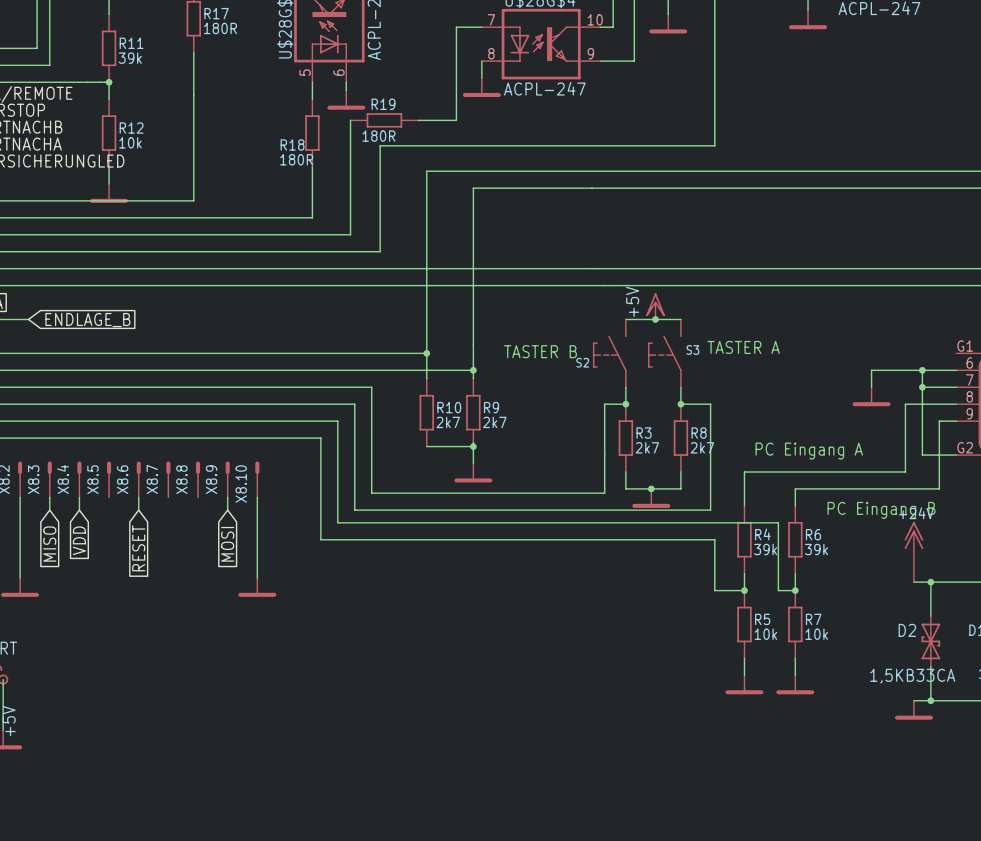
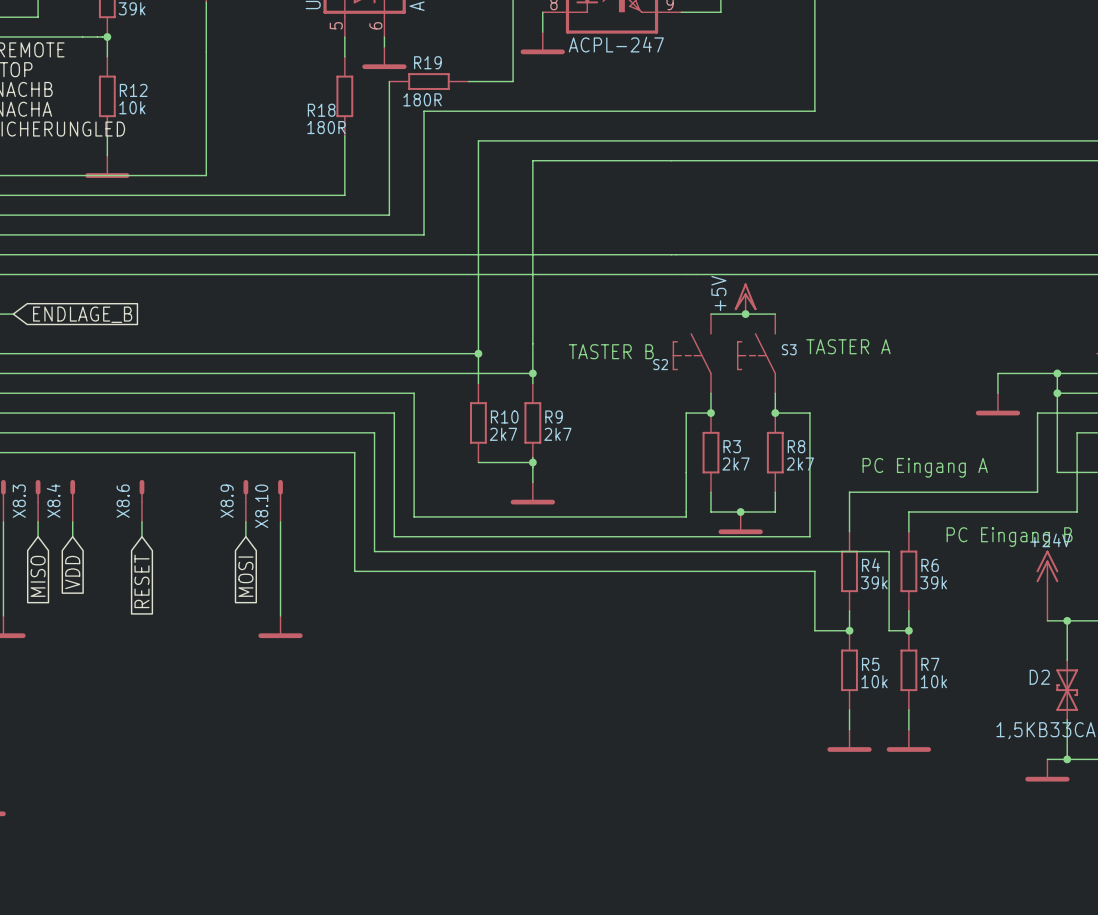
X8.5: (109, 479) -> none
X8.7: (168, 479) -> none
X8.8: (198, 479) -> none

